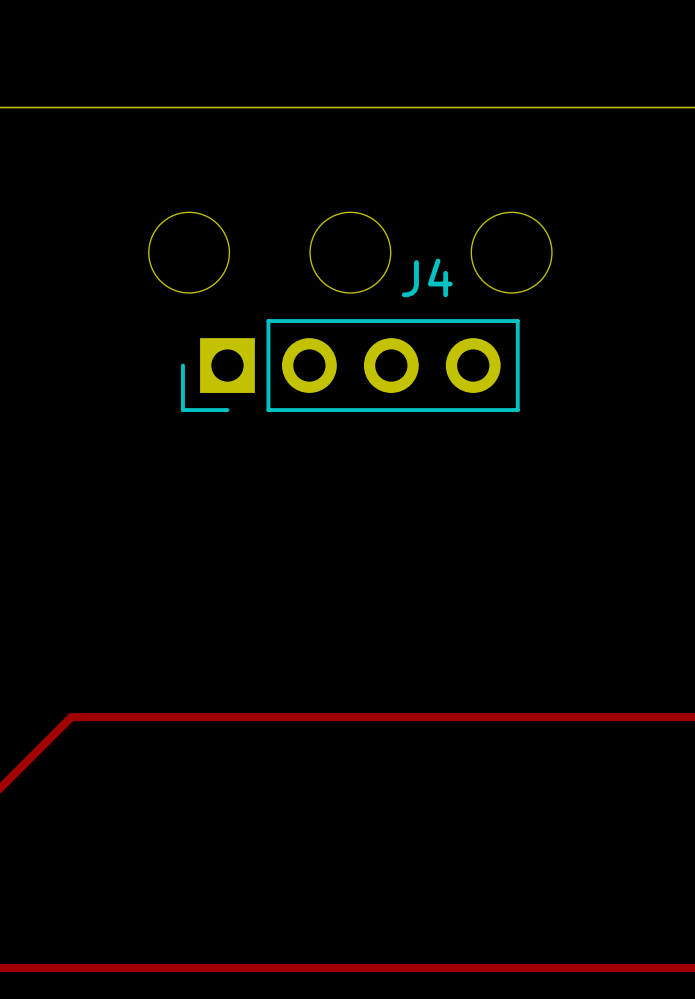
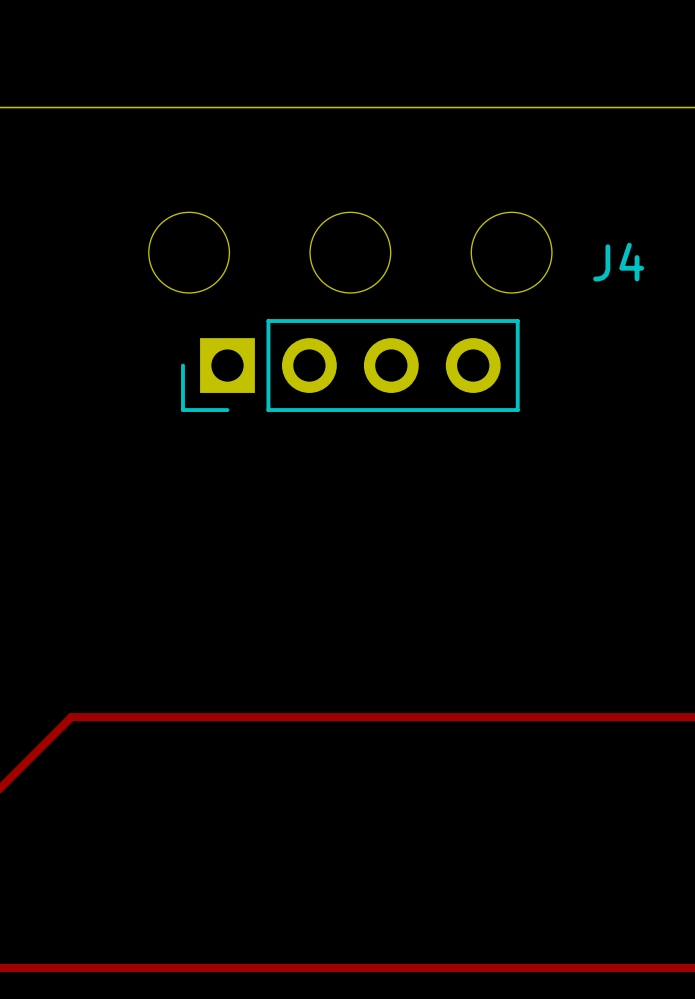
J4 name position: J4 (427, 277) -> J4 (618, 262)

